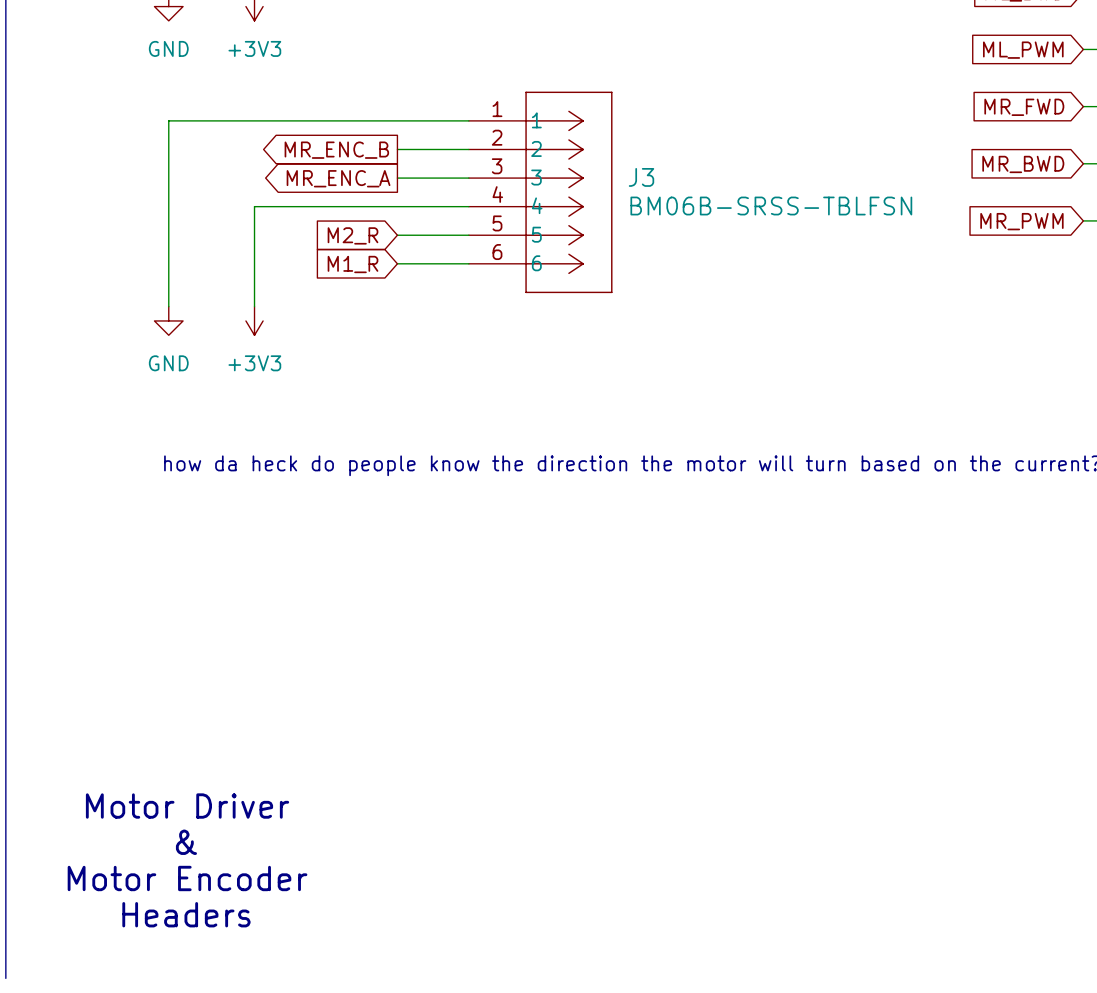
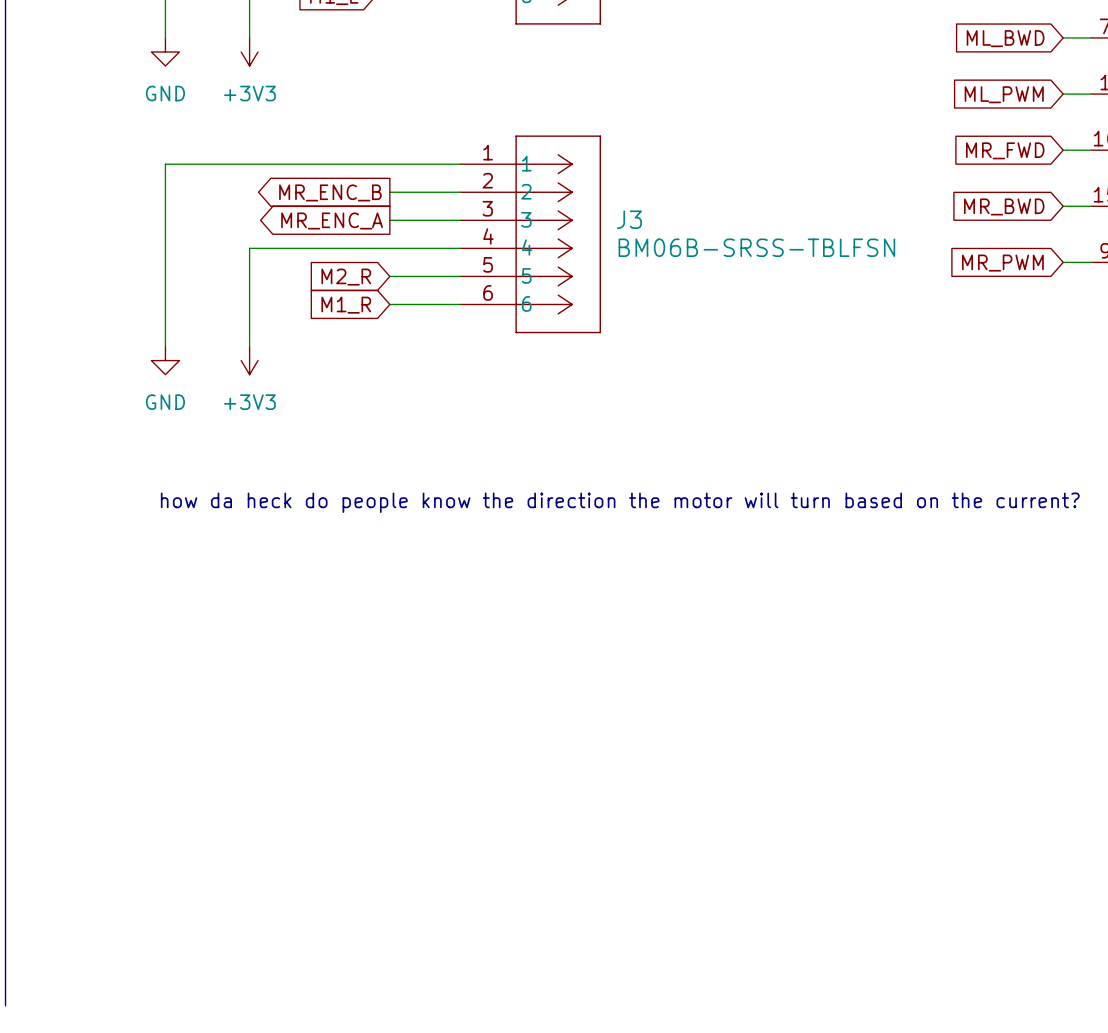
text: Motor Driver (187, 806) -> none
text: & (186, 842) -> none
text: Motor Encoder (187, 878) -> none
text: Headers (186, 914) -> none

